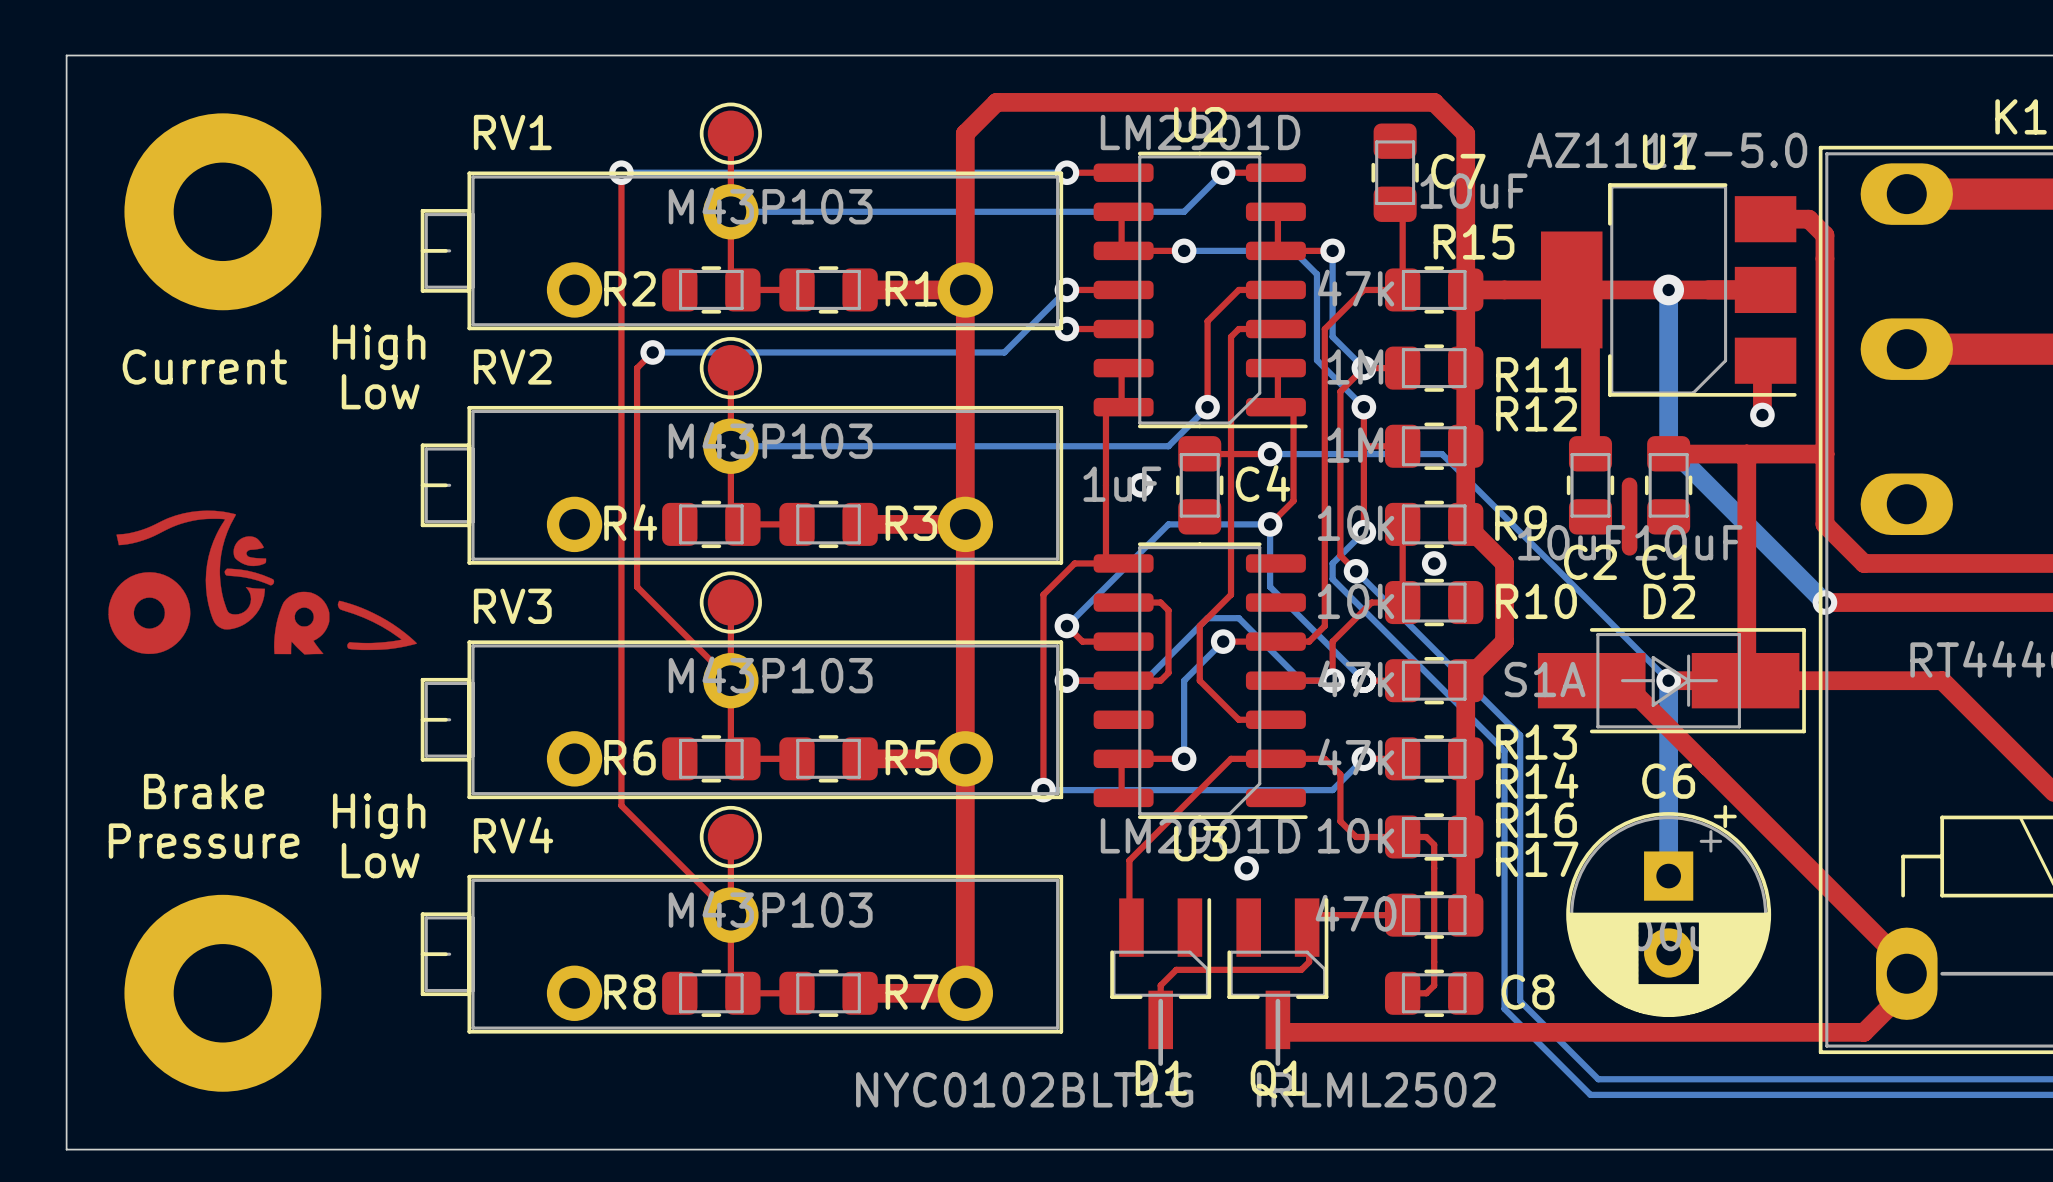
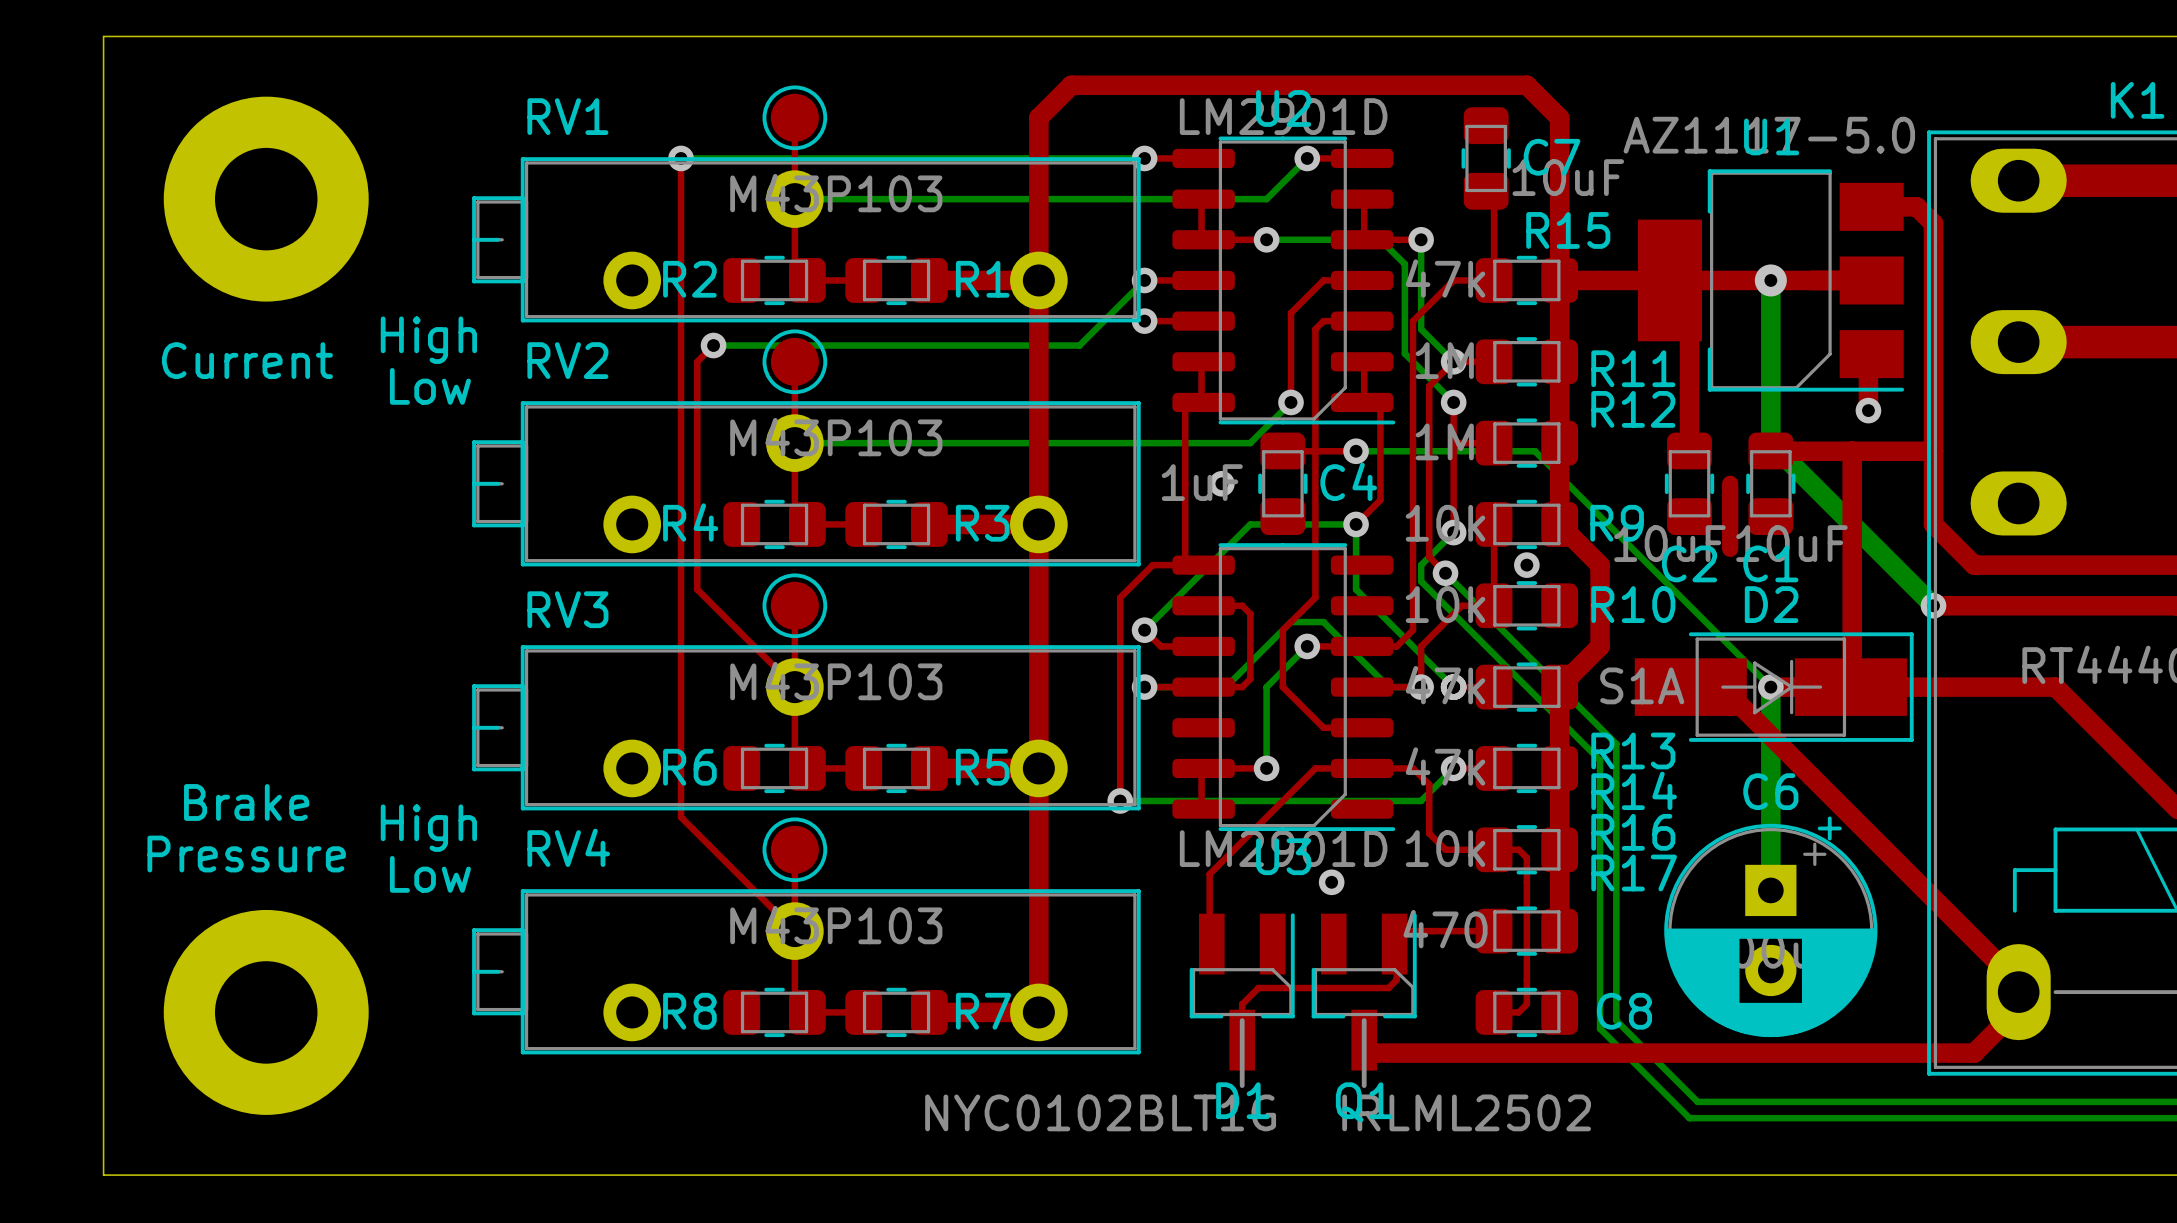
drawing: [108, 510, 417, 655] -> none

